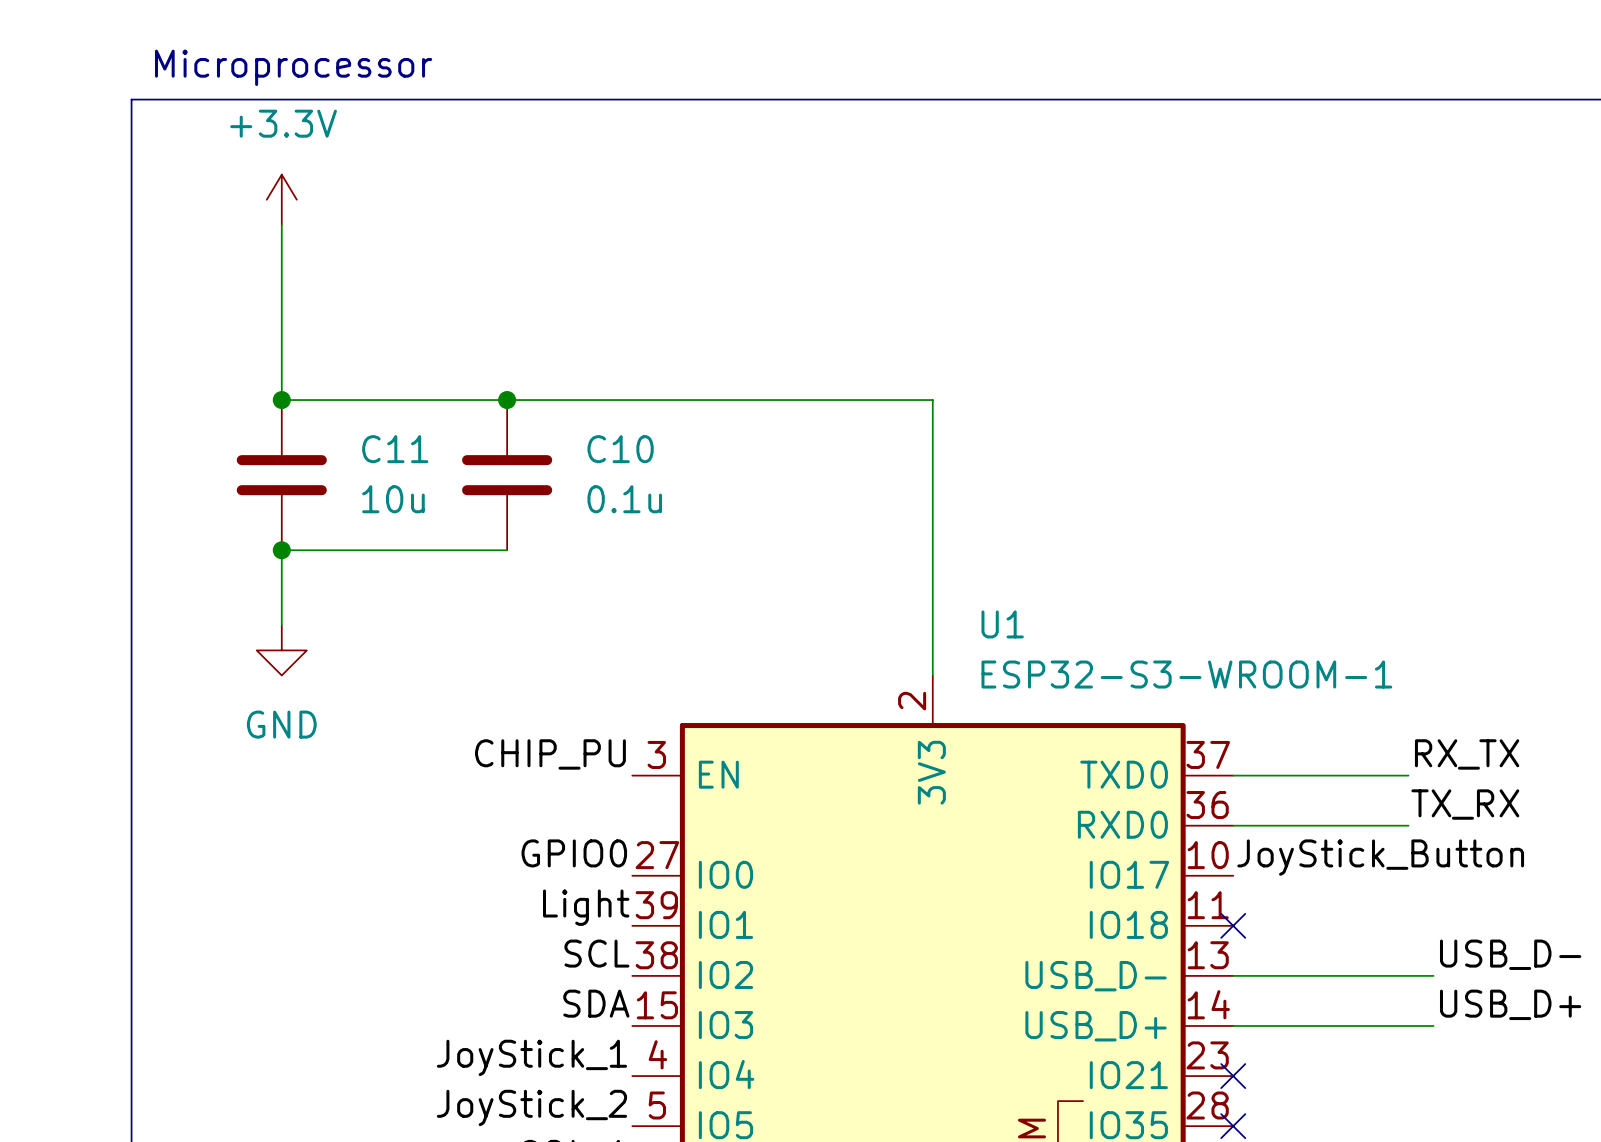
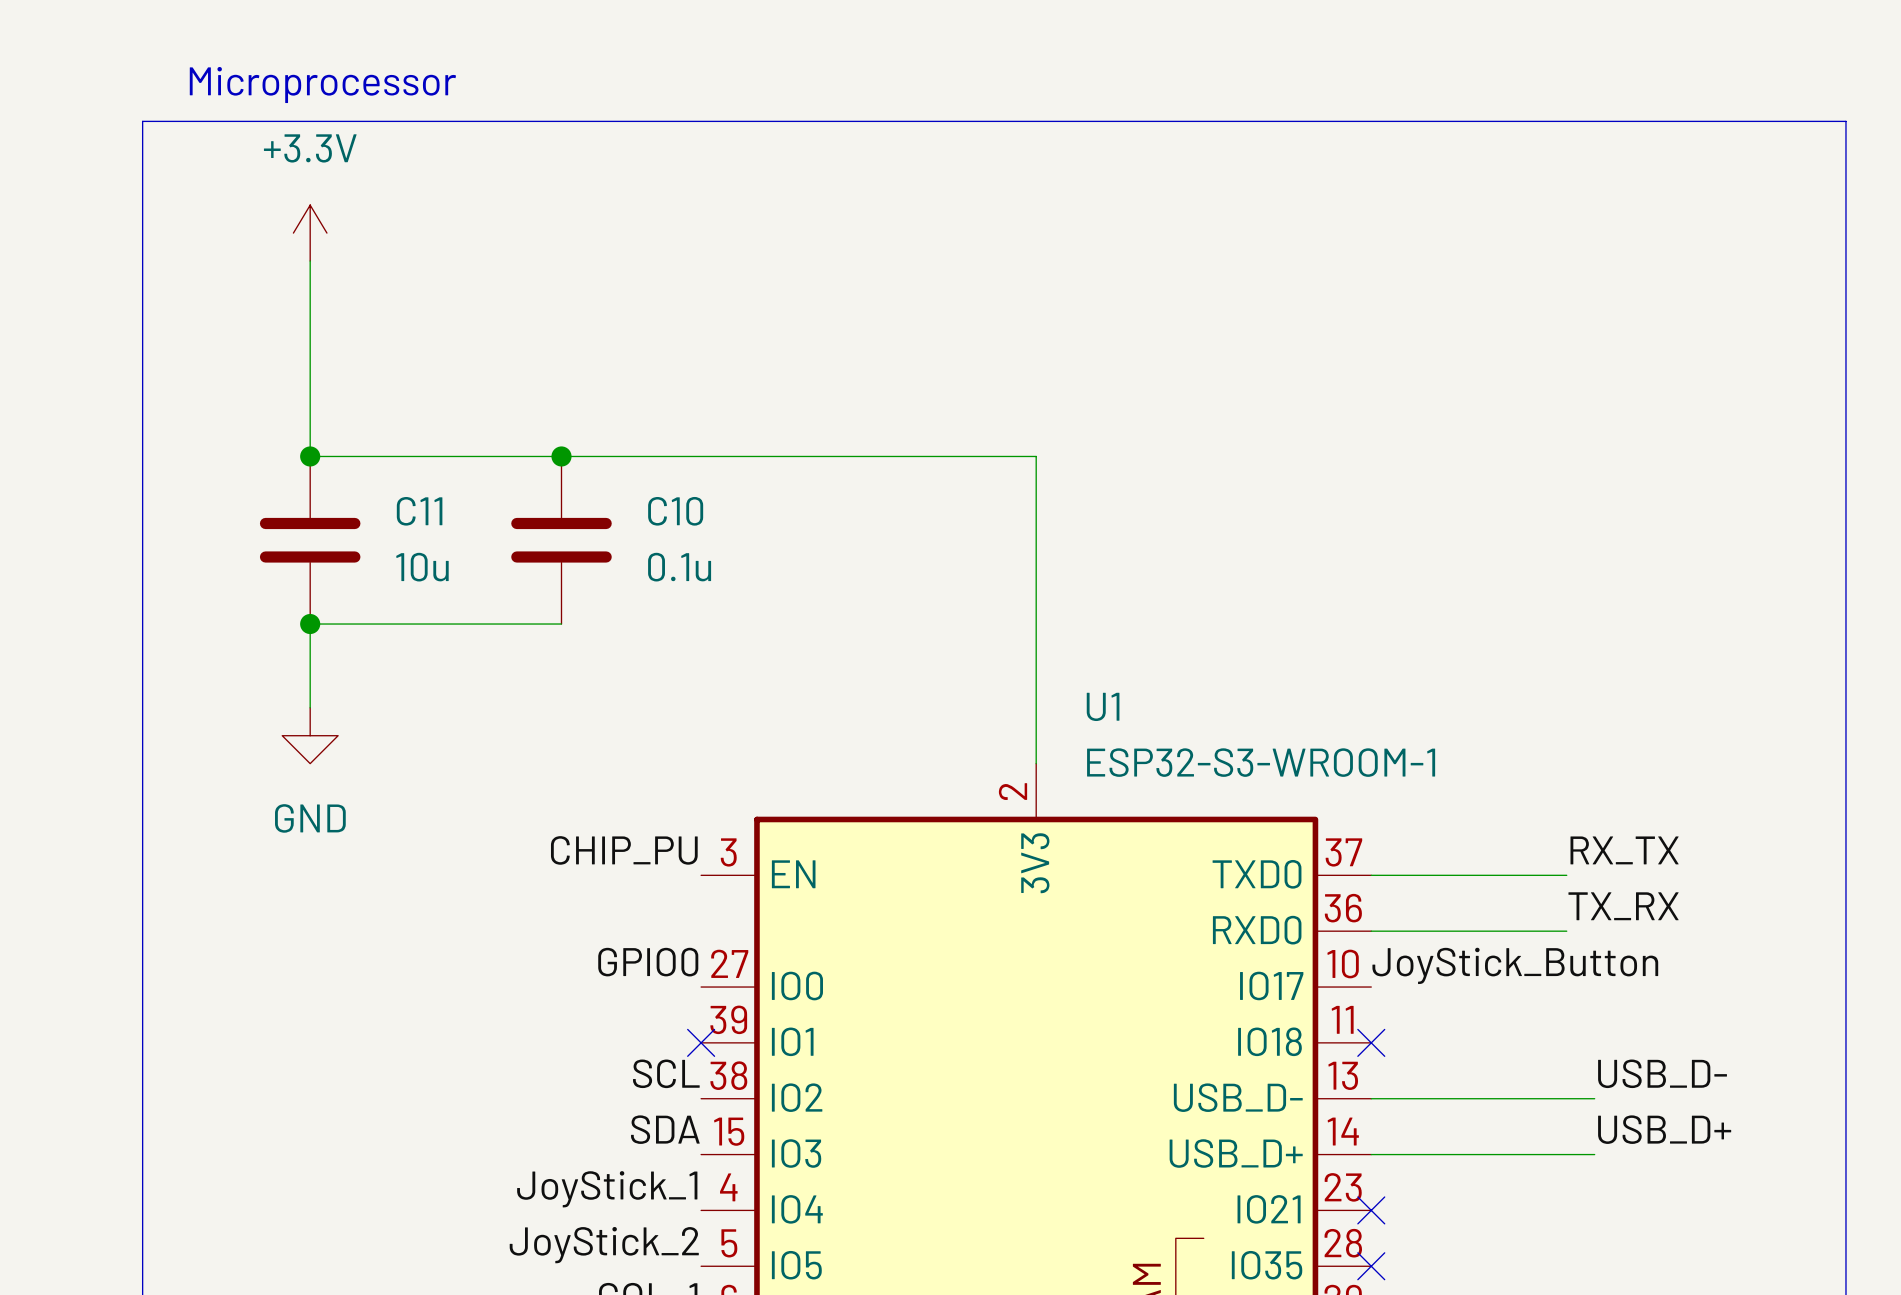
label: Light (586, 907) -> none
no-connect mark: none -> (701, 1042)

